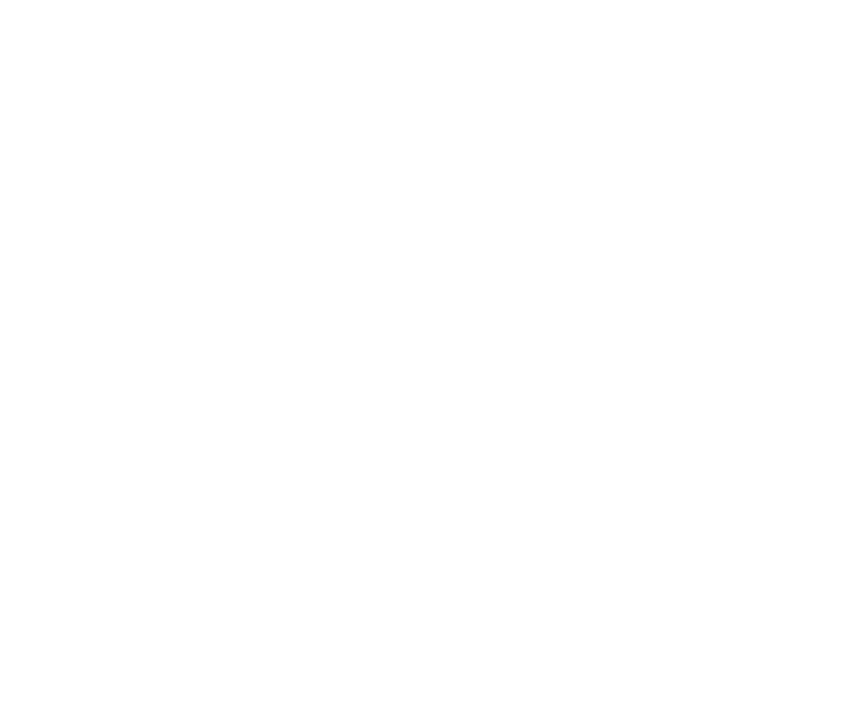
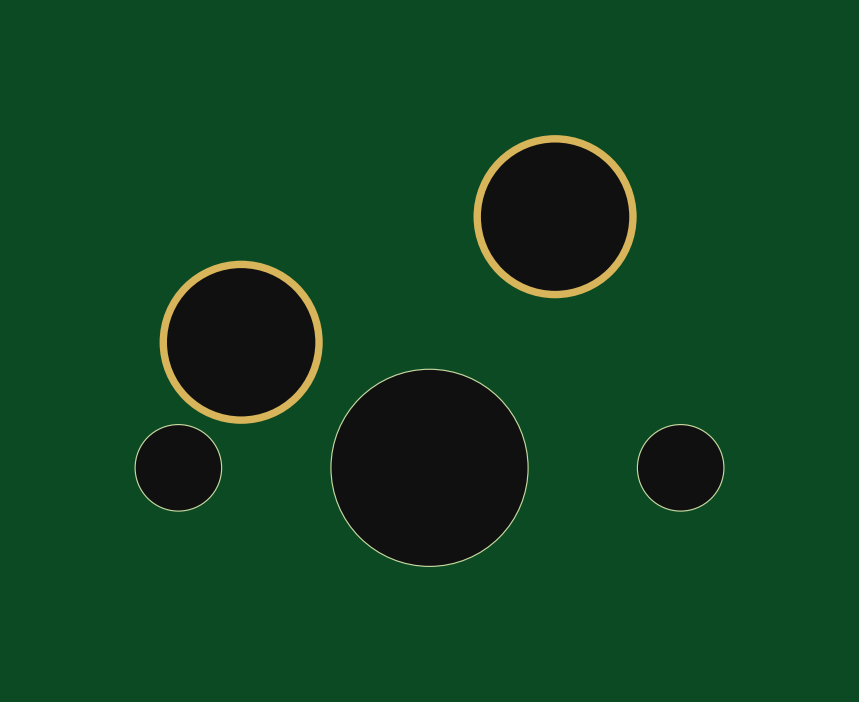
part: none -> (429, 350)

